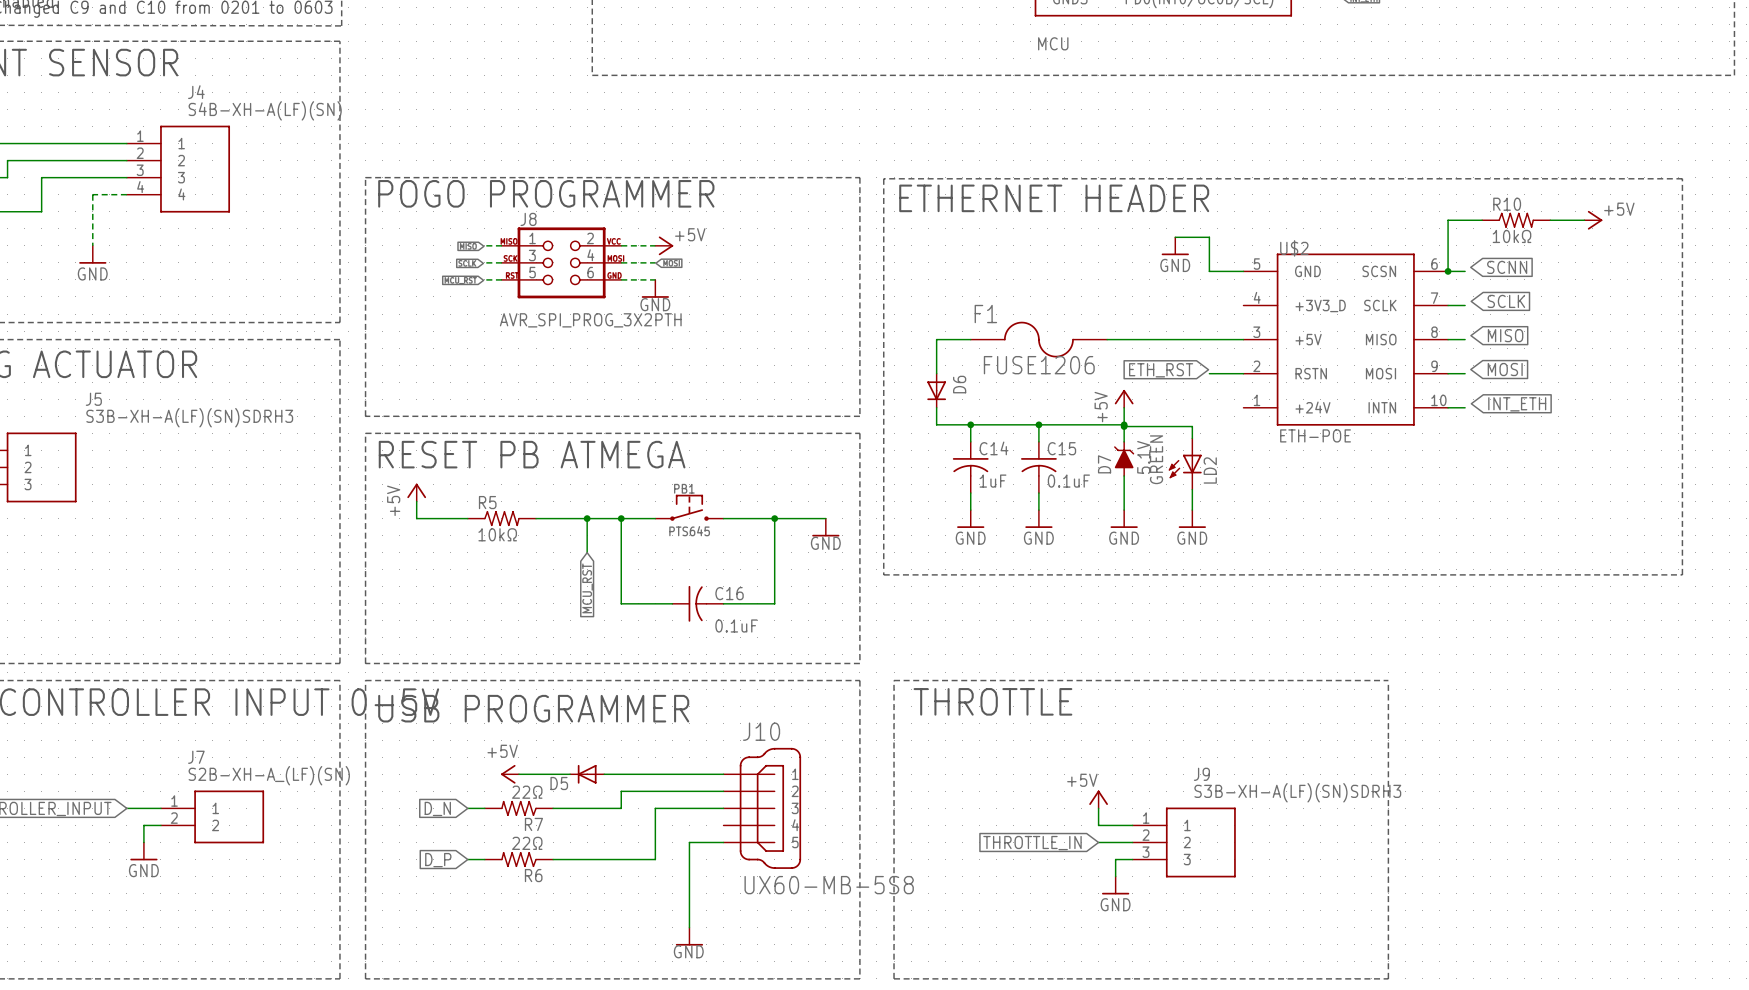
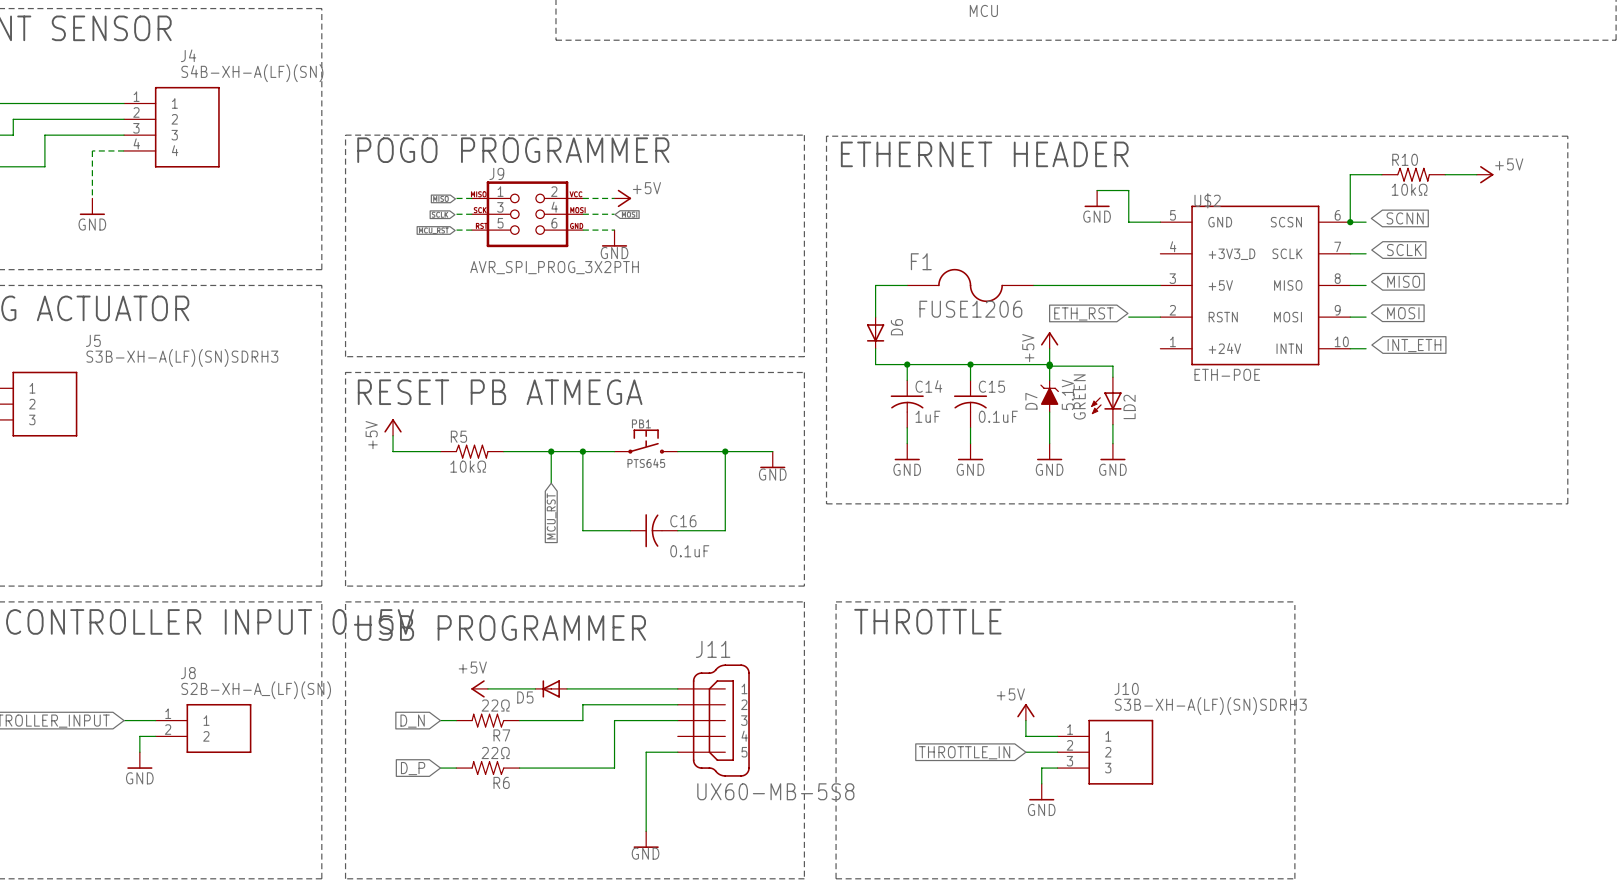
J8 name: J8 (528, 219) -> J9 (496, 173)
J10 name: J10 (761, 731) -> J11 (713, 649)
J7 name: J7 (196, 757) -> J8 (188, 673)
J9 name: J9 (1201, 774) -> J10 (1126, 688)

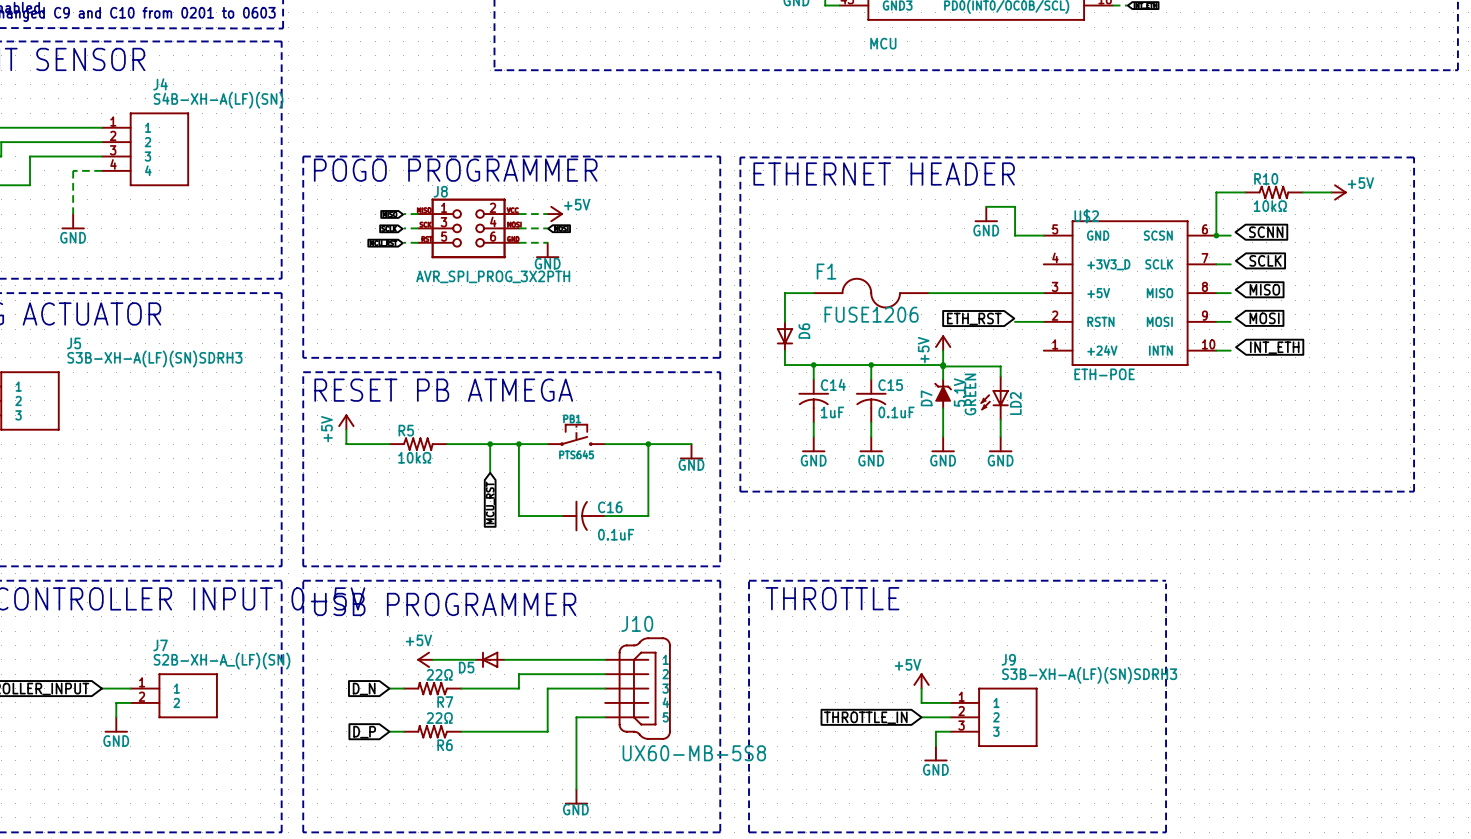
J9 name: J9 (496, 173) -> J8 (440, 191)
J11 name: J11 (713, 649) -> J10 (637, 623)
J8 name: J8 (188, 673) -> J7 (160, 645)
J10 name: J10 (1126, 688) -> J9 (1008, 659)

